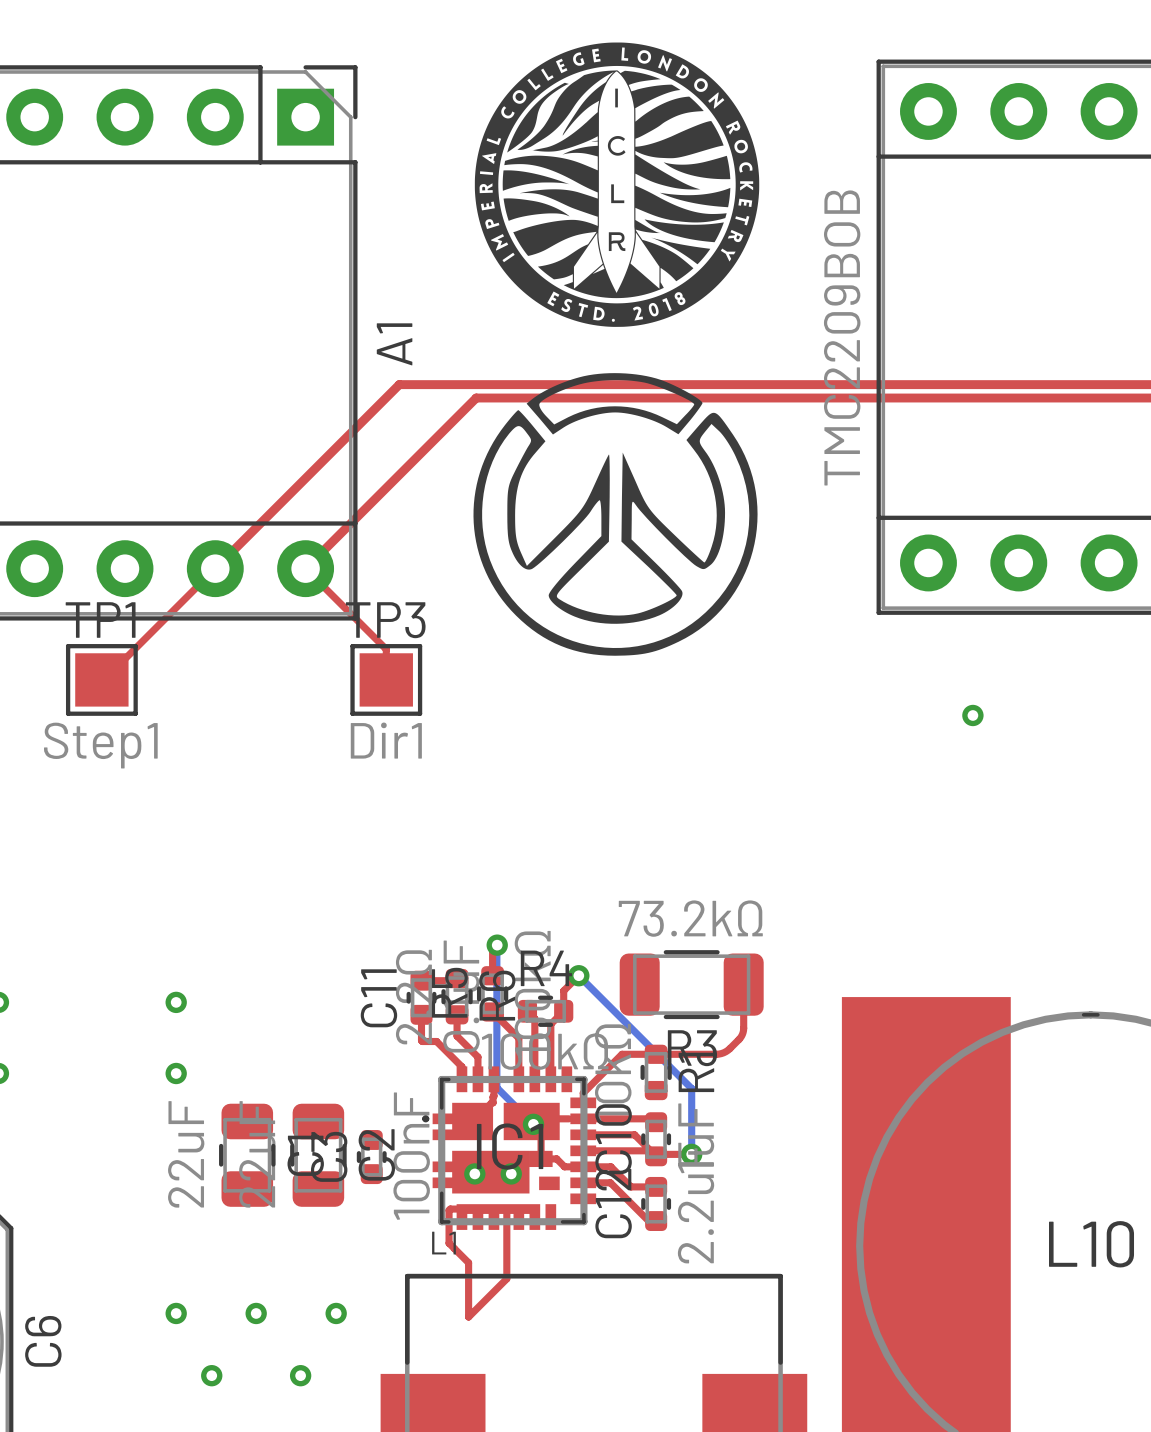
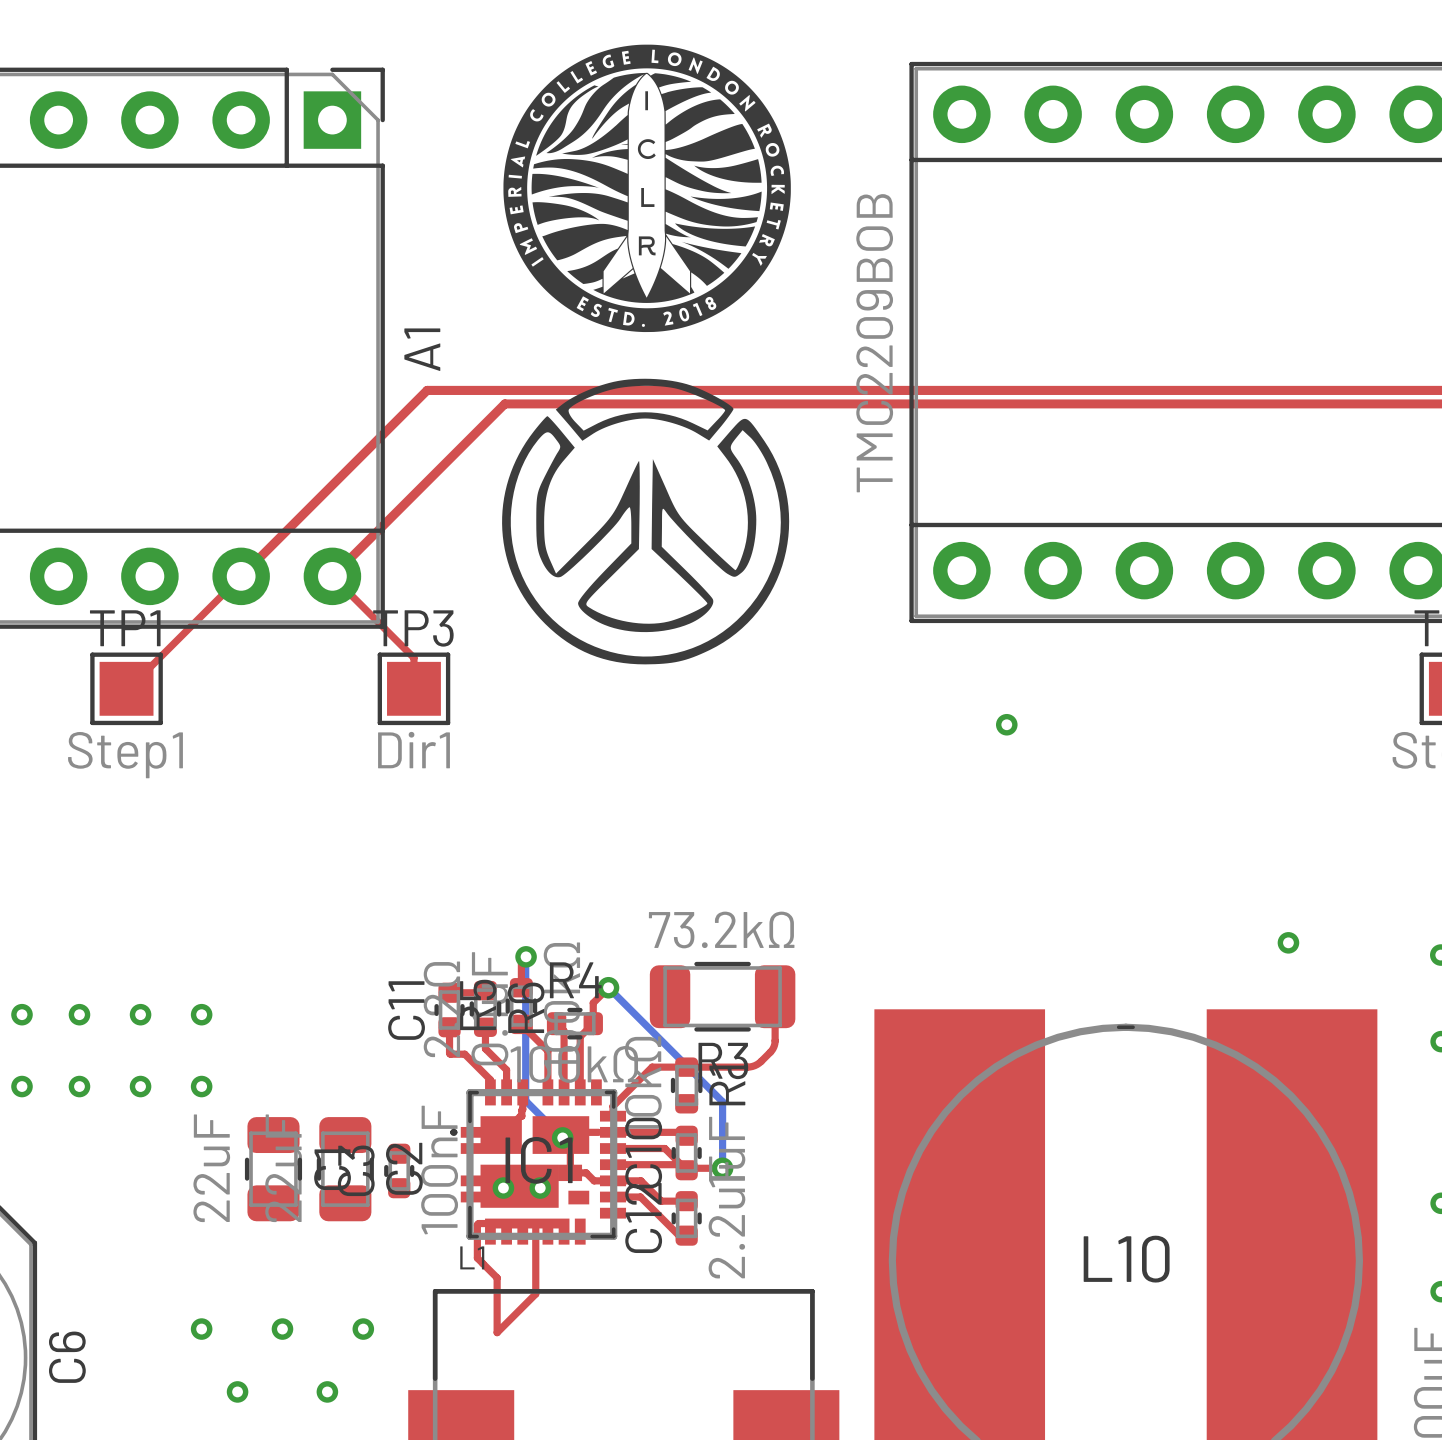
via: none -> (79, 1014)
via: none -> (140, 1014)
via: none -> (79, 1086)
via: none -> (140, 1086)

